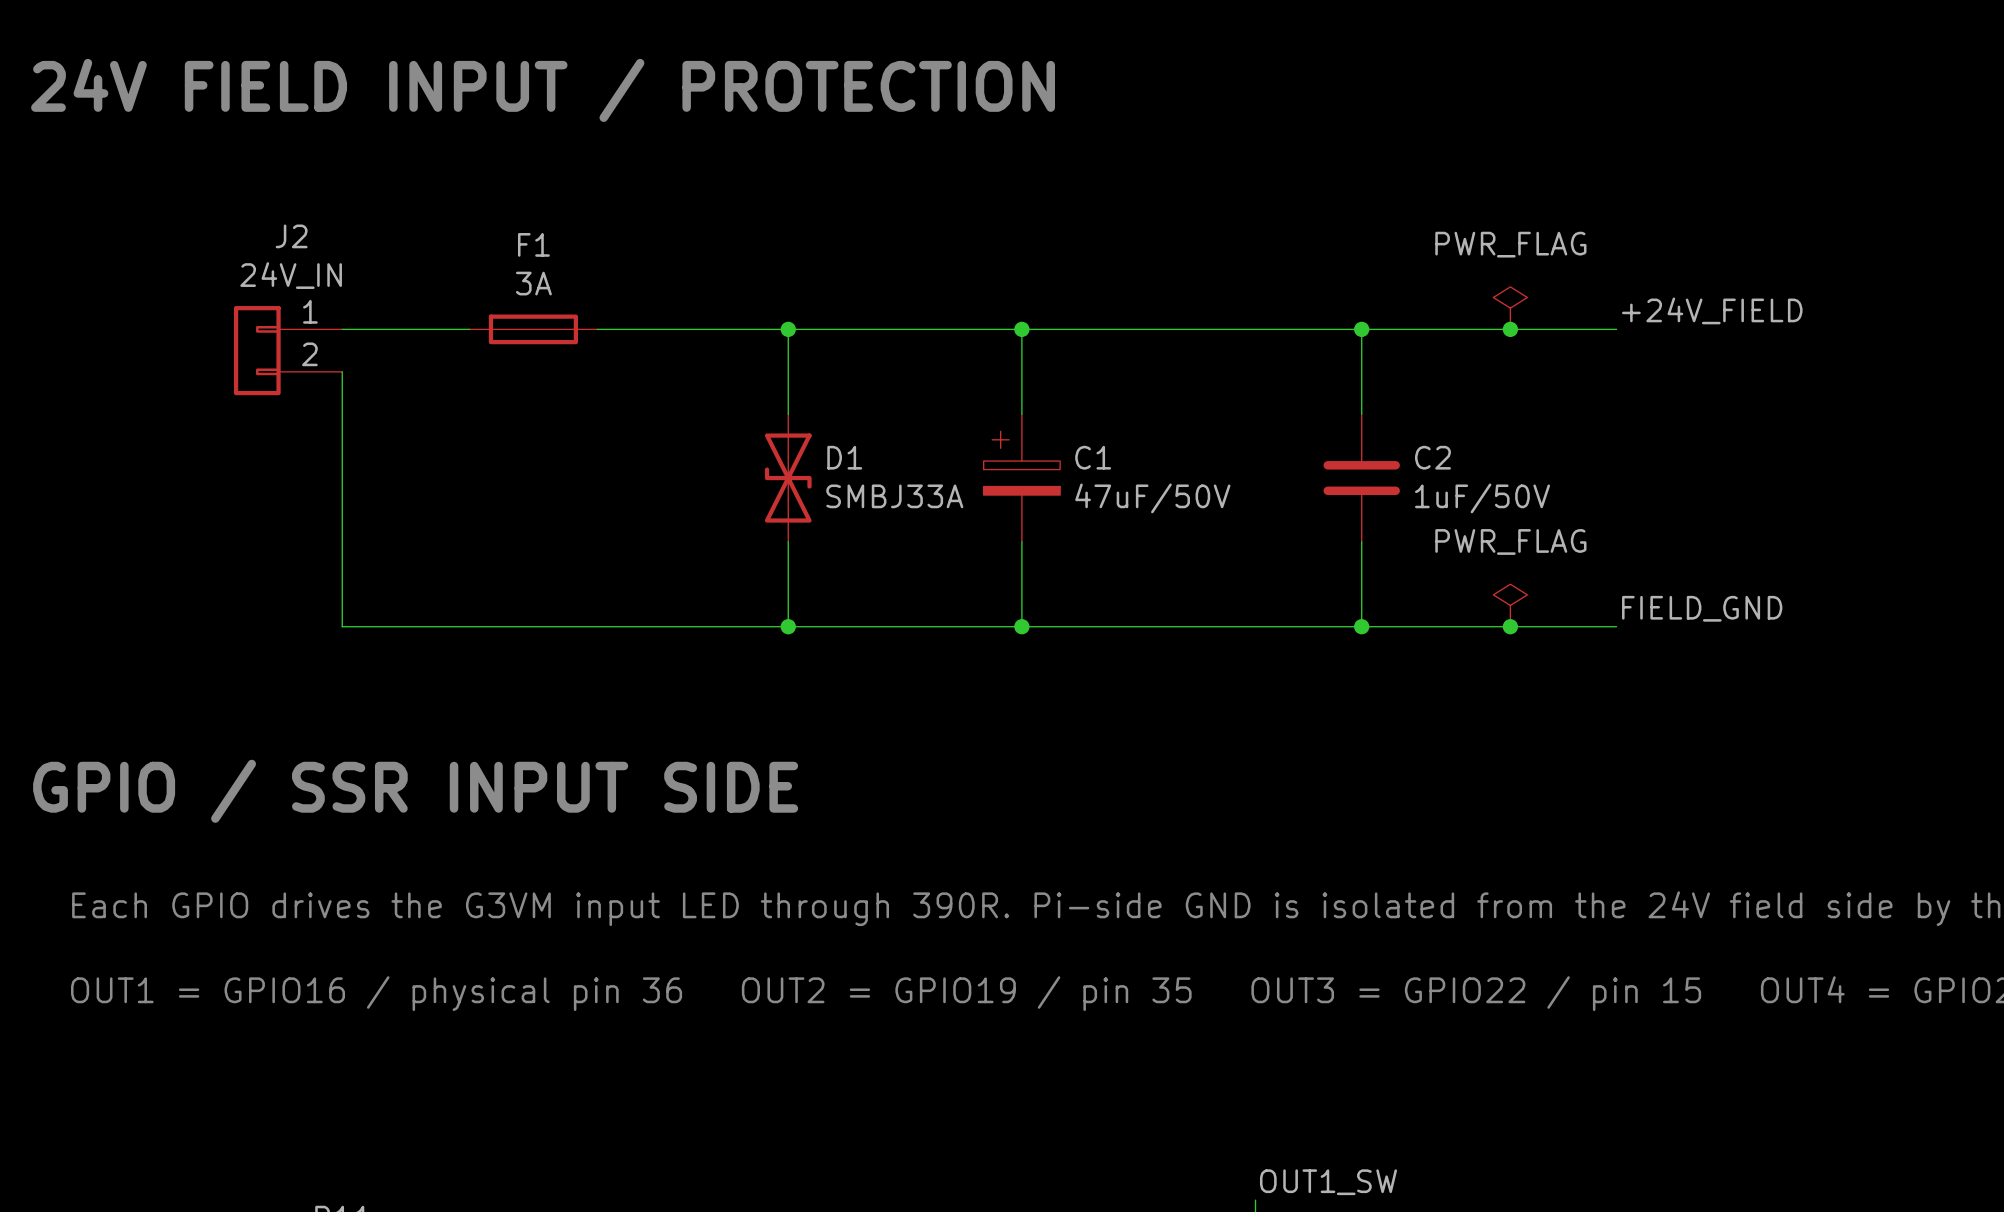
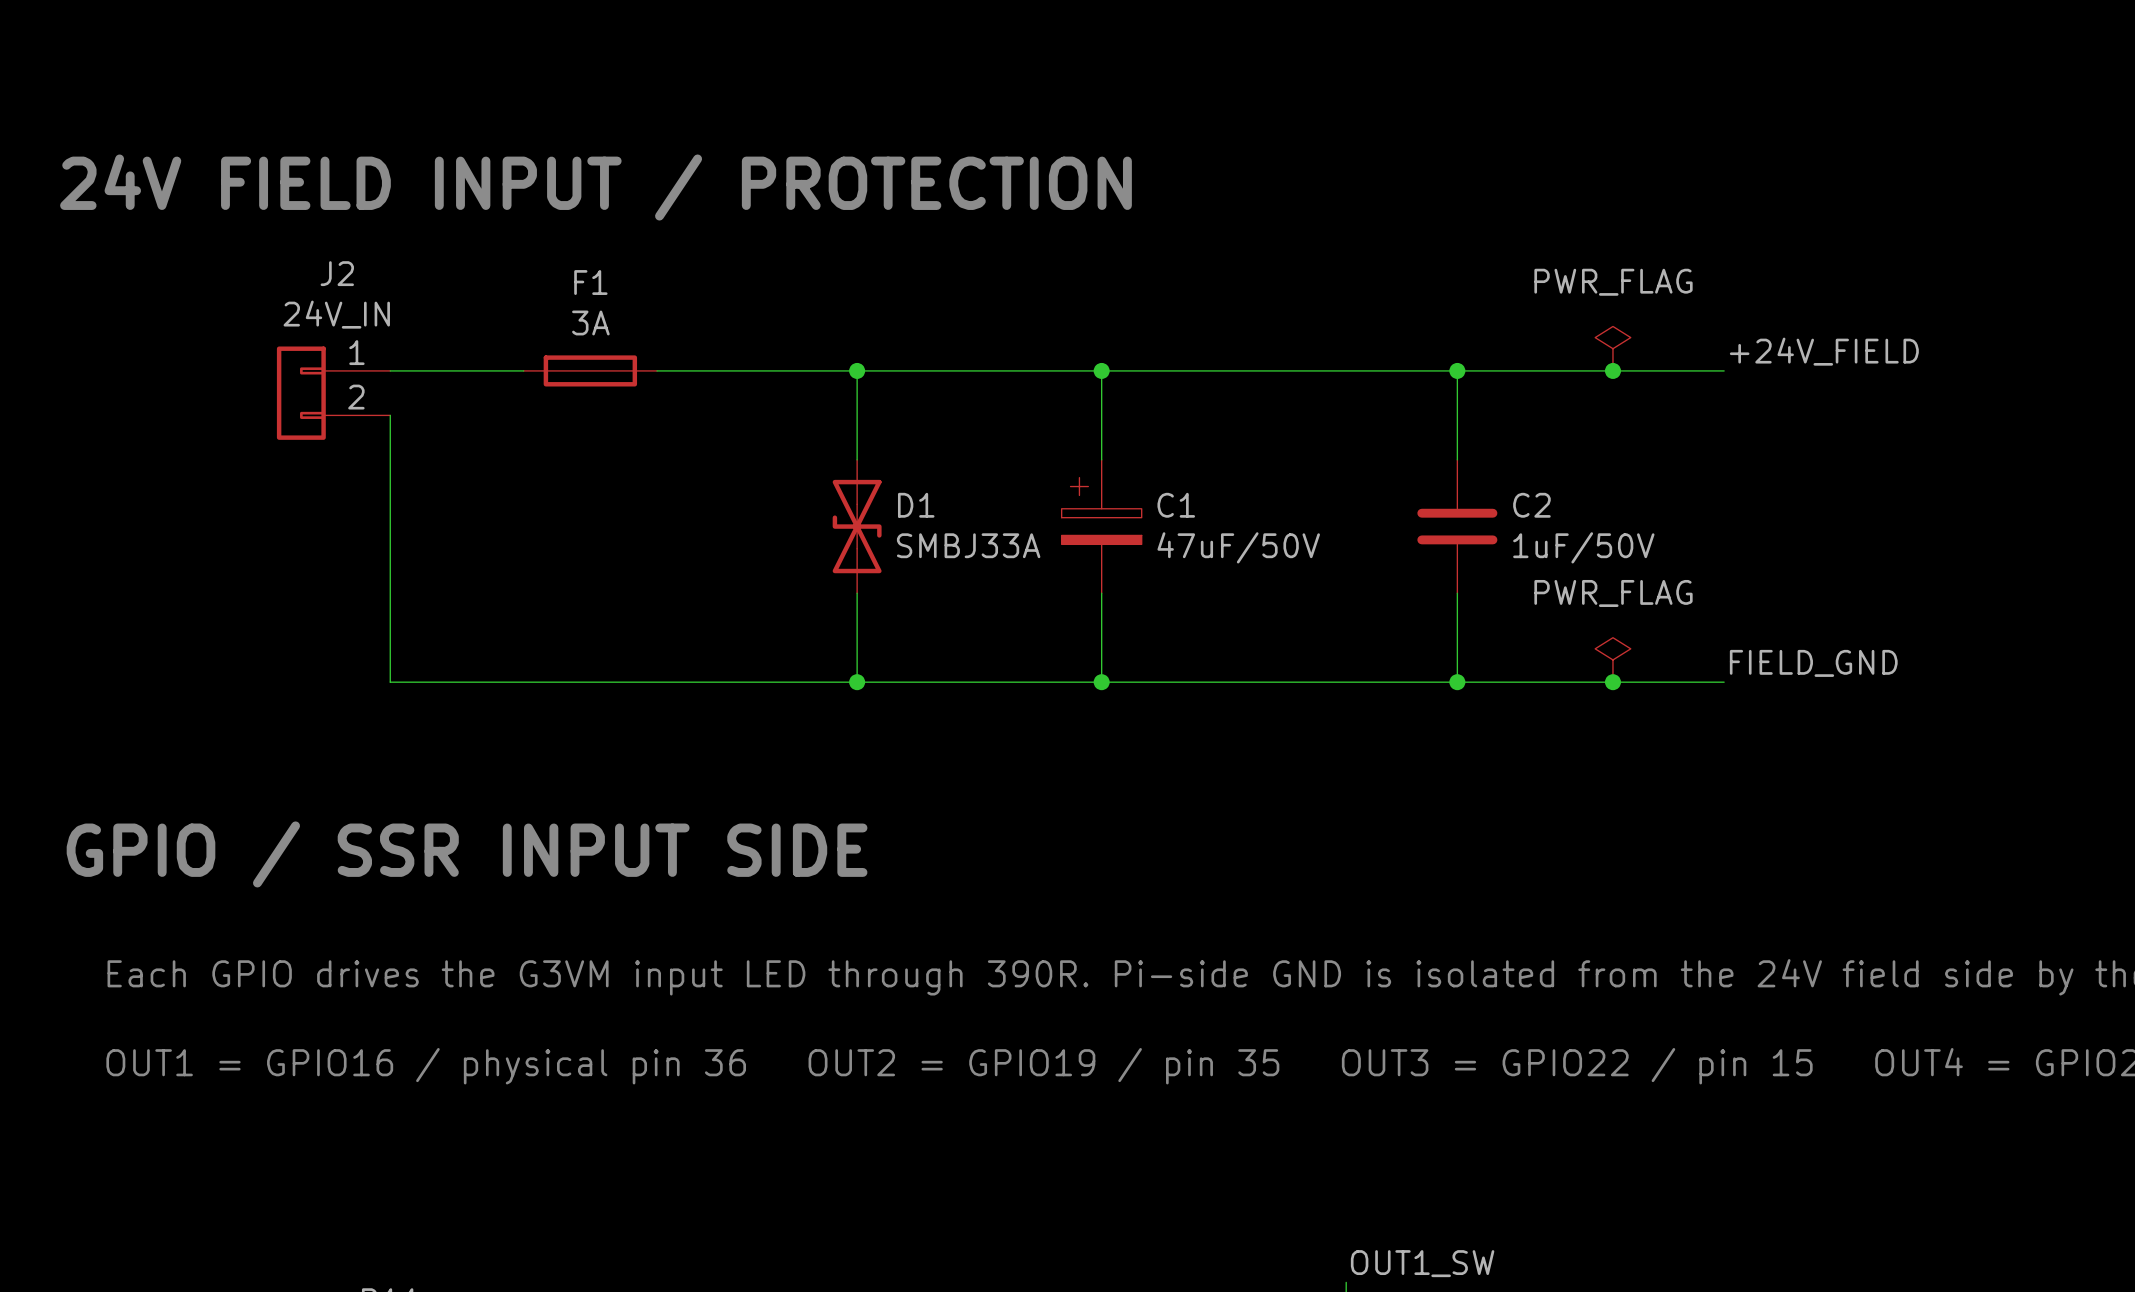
text position: 24V FIELD INPUT / PROTECTION (543, 90) -> 24V FIELD INPUT / PROTECTION (595, 187)

